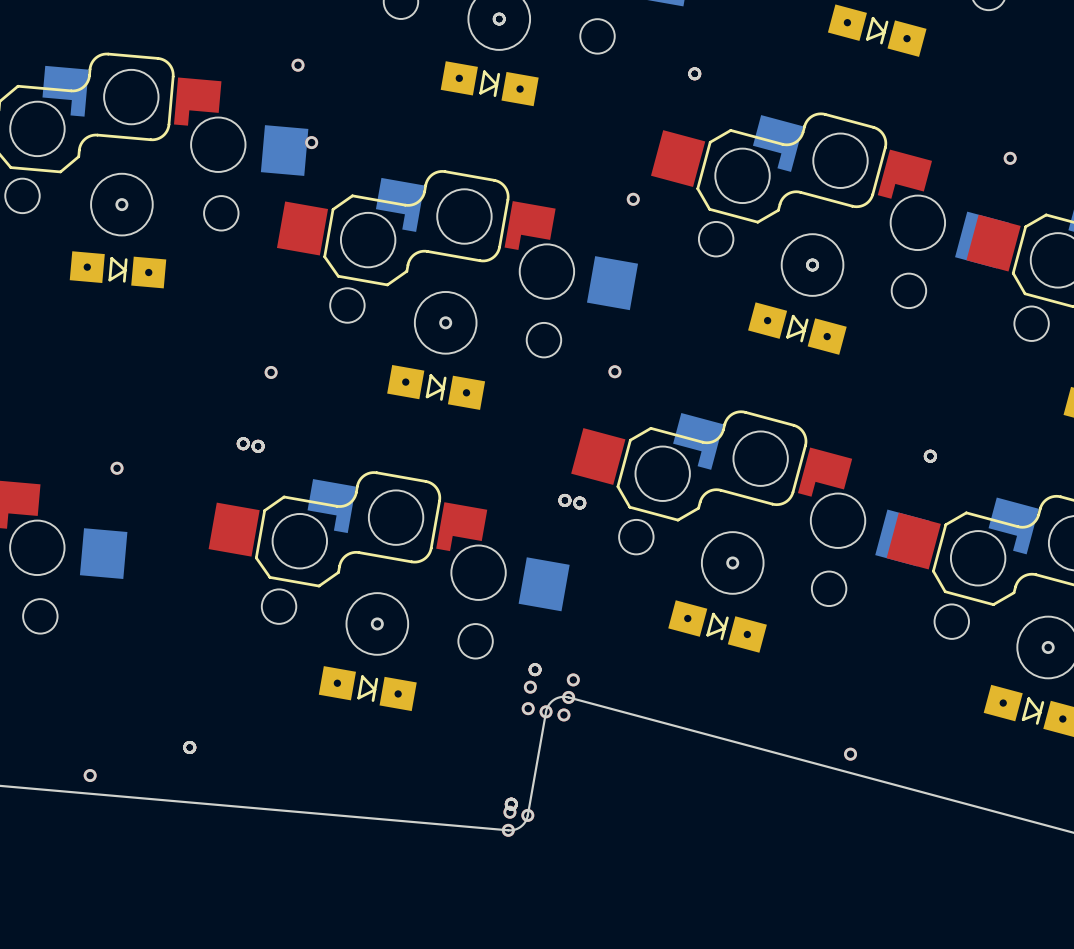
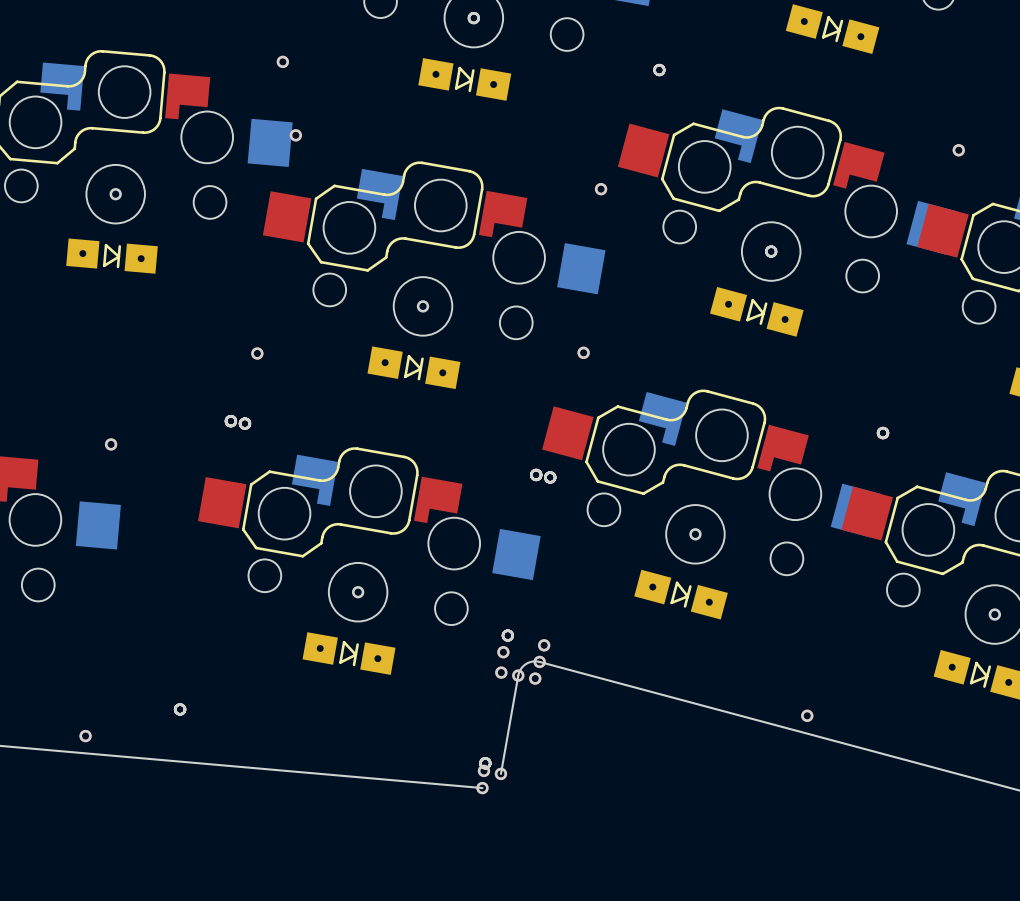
board edge: (527, 815) (520, 826) (508, 830) -> none

